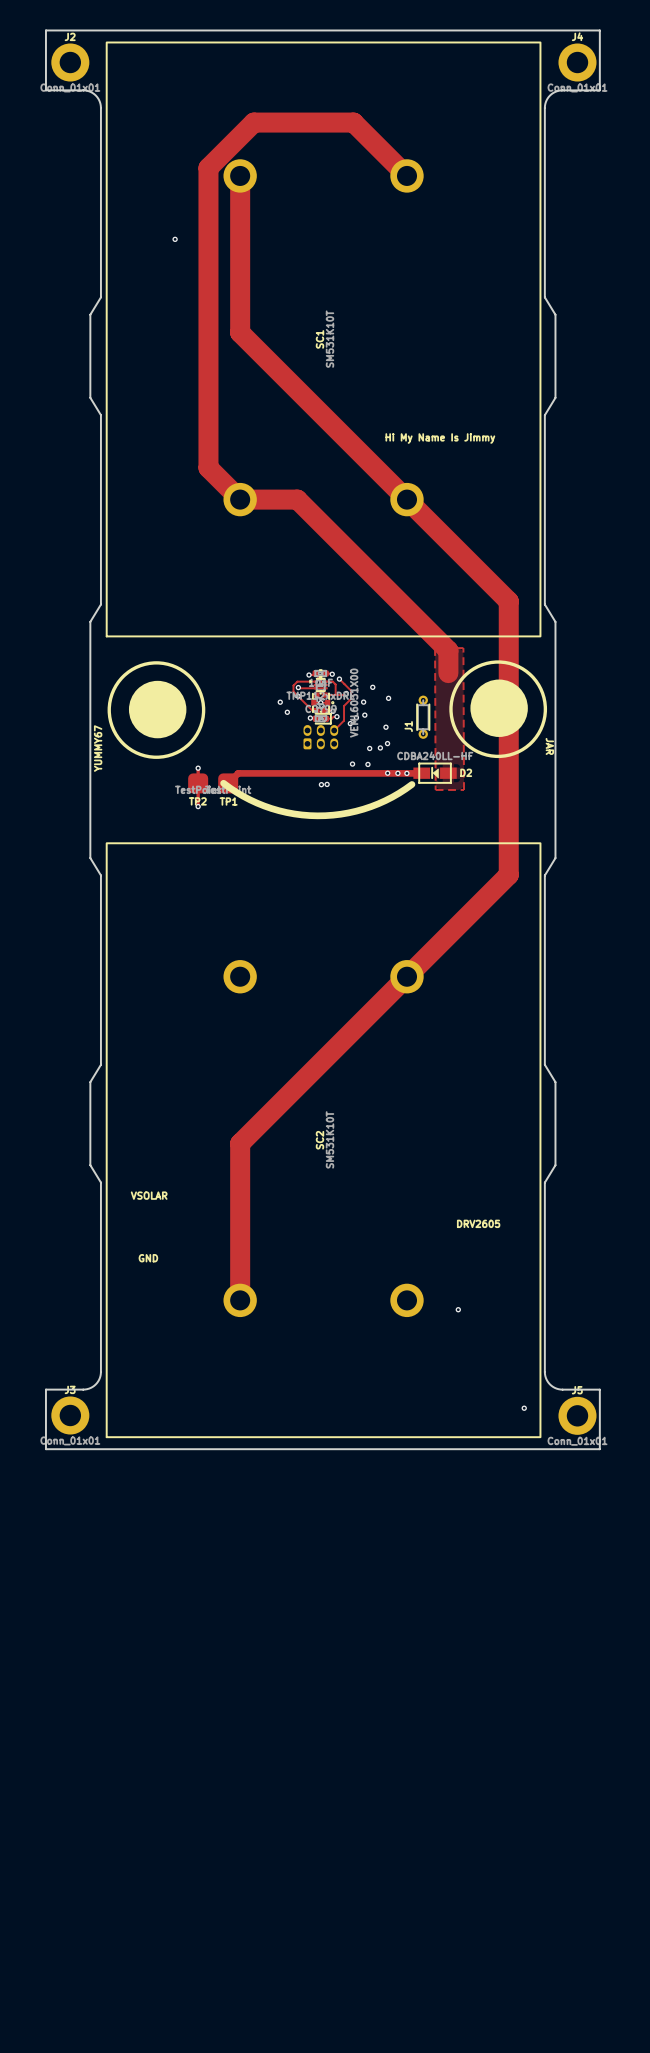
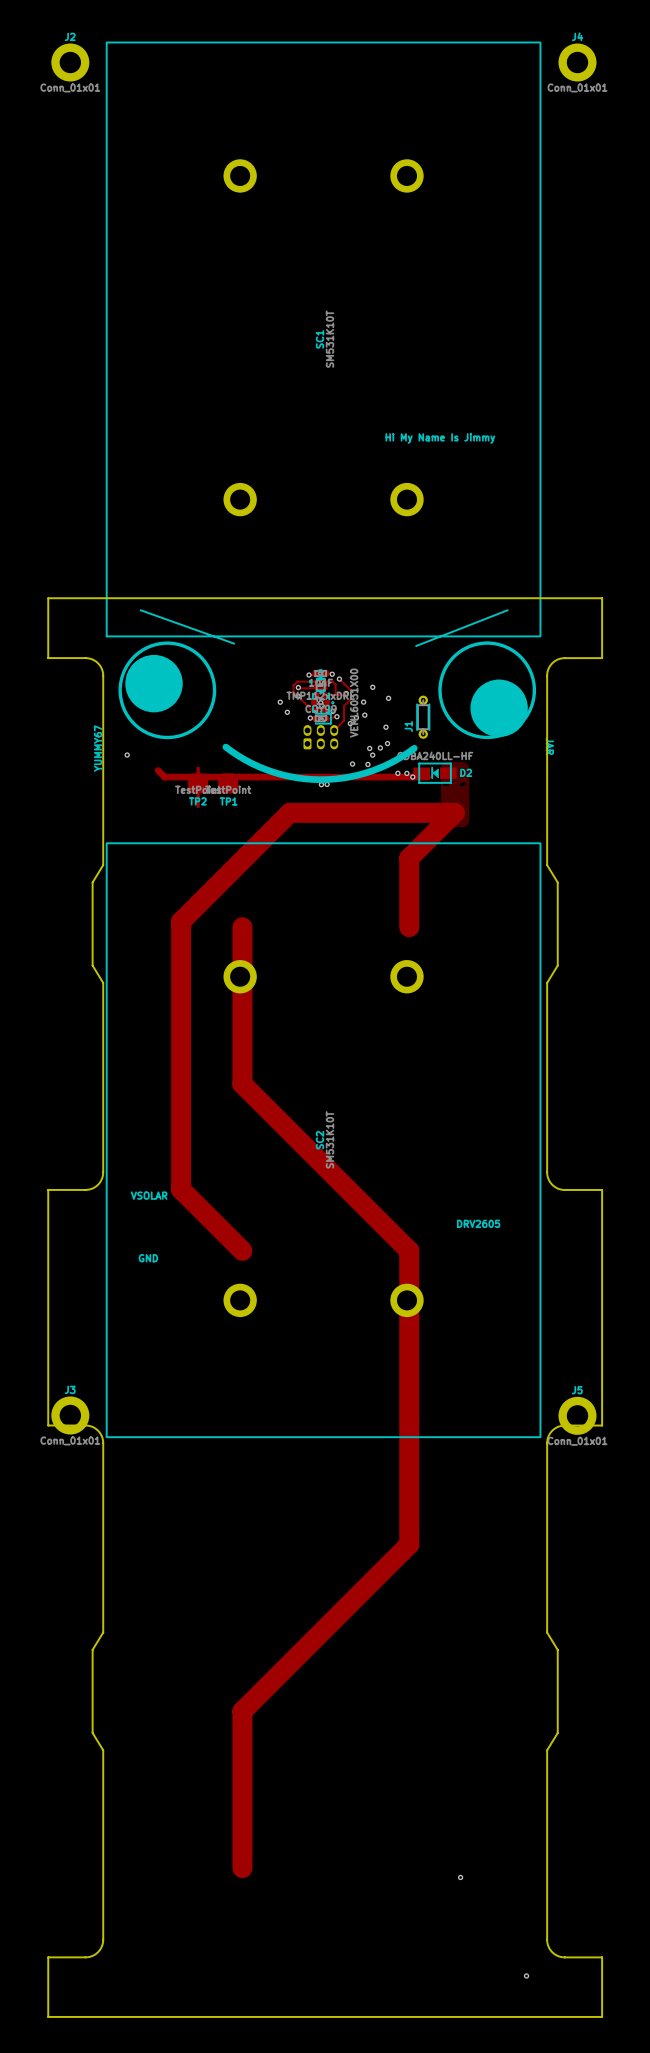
board edge: (45, 30) (45, 90) (89, 91) (98, 98) (100, 108) (100, 297) (90, 314) (90, 397) (100, 415) (100, 604) (90, 621) (90, 858) (100, 875) (100, 1064) (90, 1082) (90, 1165) (100, 1182) (100, 1371) (98, 1381) (89, 1388) (45, 1389) (45, 1449) (599, 1449) (599, 1389) (556, 1388) (548, 1383) (544, 1371) (544, 1182) (555, 1165) (555, 1082) (544, 1064) (544, 875) (555, 858) (555, 621) (544, 604) (544, 415) (555, 397) (555, 314) (544, 297) (544, 108) (548, 96) (556, 91) (599, 90) (599, 30) (45, 30) -> none
track: (240, 175) (240, 332) (508, 601) (508, 874) (240, 1143) (240, 1300) -> none
track: (406, 175) (353, 122) (253, 122) (208, 168) (208, 467) (240, 499) (297, 499) (448, 650) (448, 673) -> none
via: (175, 239) -> none
board edge: none -> (48, 598) (48, 658) (91, 659) (100, 666) (103, 675) (103, 865) (92, 882) (92, 965) (103, 982) (103, 1174) (99, 1183) (91, 1188) (48, 1189) (48, 1425) (91, 1426) (99, 1432) (103, 1441) (103, 1632) (92, 1649) (92, 1732) (103, 1750) (103, 1939) (100, 1949) (91, 1956) (48, 1957) (48, 2016) (602, 2016) (602, 1957) (559, 1956) (549, 1949) (547, 1939) (547, 1750) (557, 1733) (557, 1649) (547, 1632) (547, 1441) (550, 1432) (559, 1426) (602, 1425) (602, 1189) (559, 1189) (550, 1183) (547, 1174) (547, 982) (557, 965) (557, 882) (547, 865) (547, 675) (549, 666) (559, 659) (602, 658) (602, 598) (48, 598)
line: none -> (140, 610) (234, 643)
line: none -> (507, 610) (416, 646)
zone outline: (435, 648) (435, 789) (464, 789) (463, 648) (435, 648) -> none
drawing position: (157, 709) -> (154, 683)
drawing position: (498, 709) -> (487, 690)
drawing position: (156, 710) -> (167, 690)
via: none -> (127, 755)
via: none -> (372, 755)
via: (198, 768) -> none
via: (387, 773) -> none
track: (421, 773) (238, 773) (228, 783) -> none
track: none -> (164, 776) (158, 770) (164, 777) (427, 777)
via: none -> (412, 777)
line: (223, 783) (243, 796) (271, 808) (294, 813) (317, 815) (340, 814) (371, 806) (392, 797) (412, 784) -> (225, 747) (245, 759) (266, 769) (288, 776) (319, 779) (343, 778) (365, 772) (387, 764) (414, 748)
via: (198, 806) -> none
track: none -> (242, 927) (242, 1084) (409, 1250) (409, 1544) (242, 1711) (242, 1868)
track: none -> (409, 927) (409, 858) (454, 812) (289, 812) (181, 921) (181, 1189) (242, 1250)
via: (458, 1309) -> none
via: (524, 1408) -> none
via: none -> (460, 1877)
via: none -> (526, 1975)

